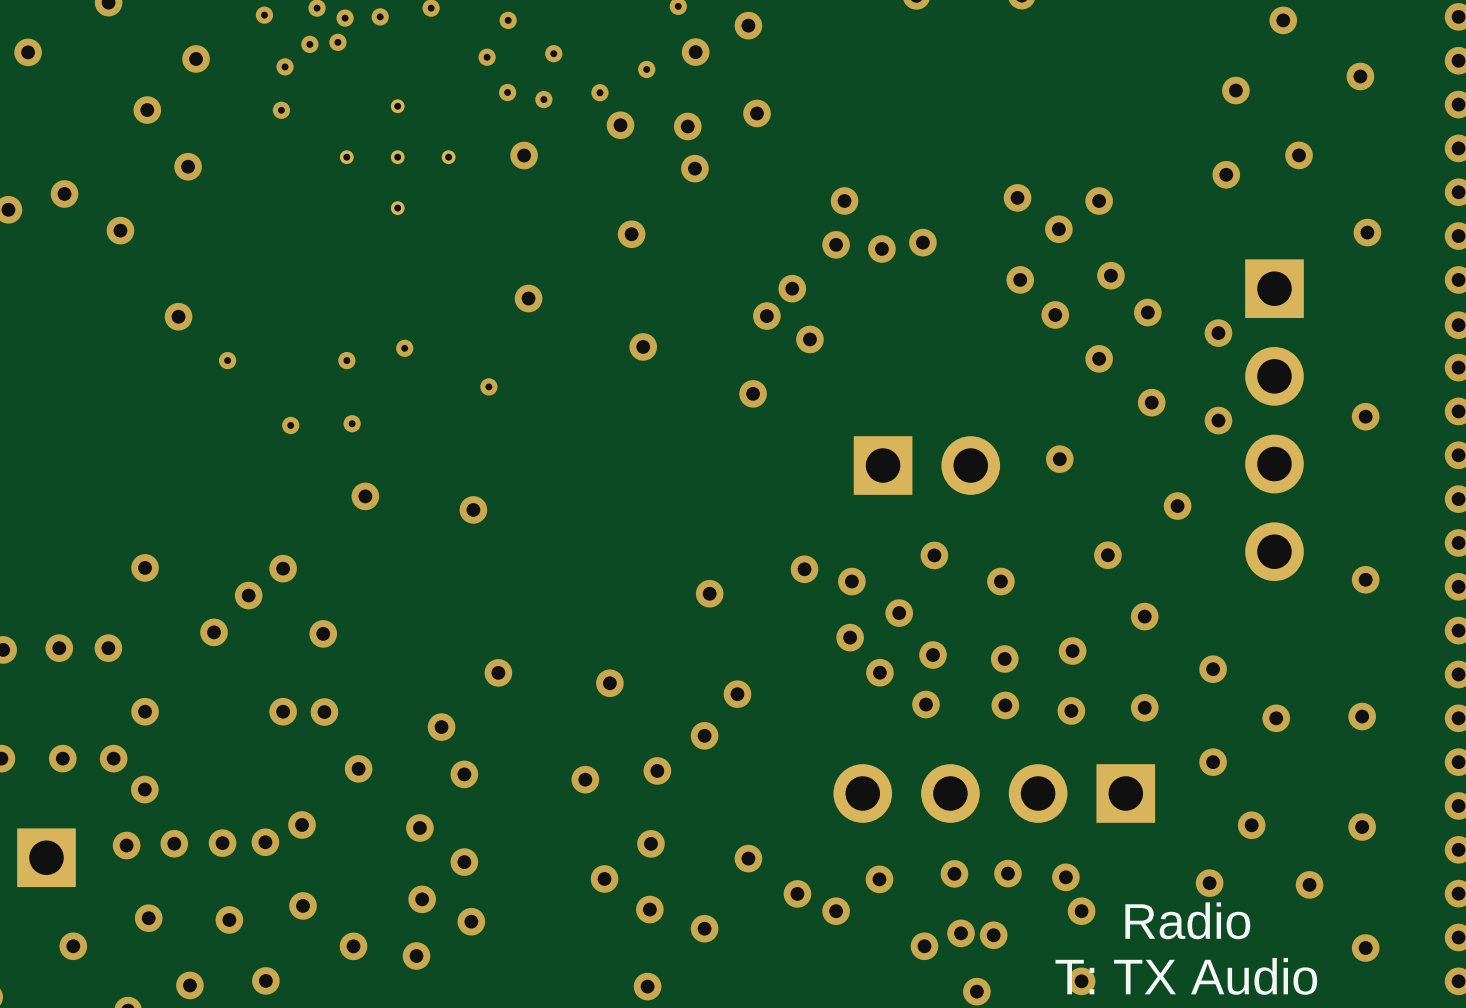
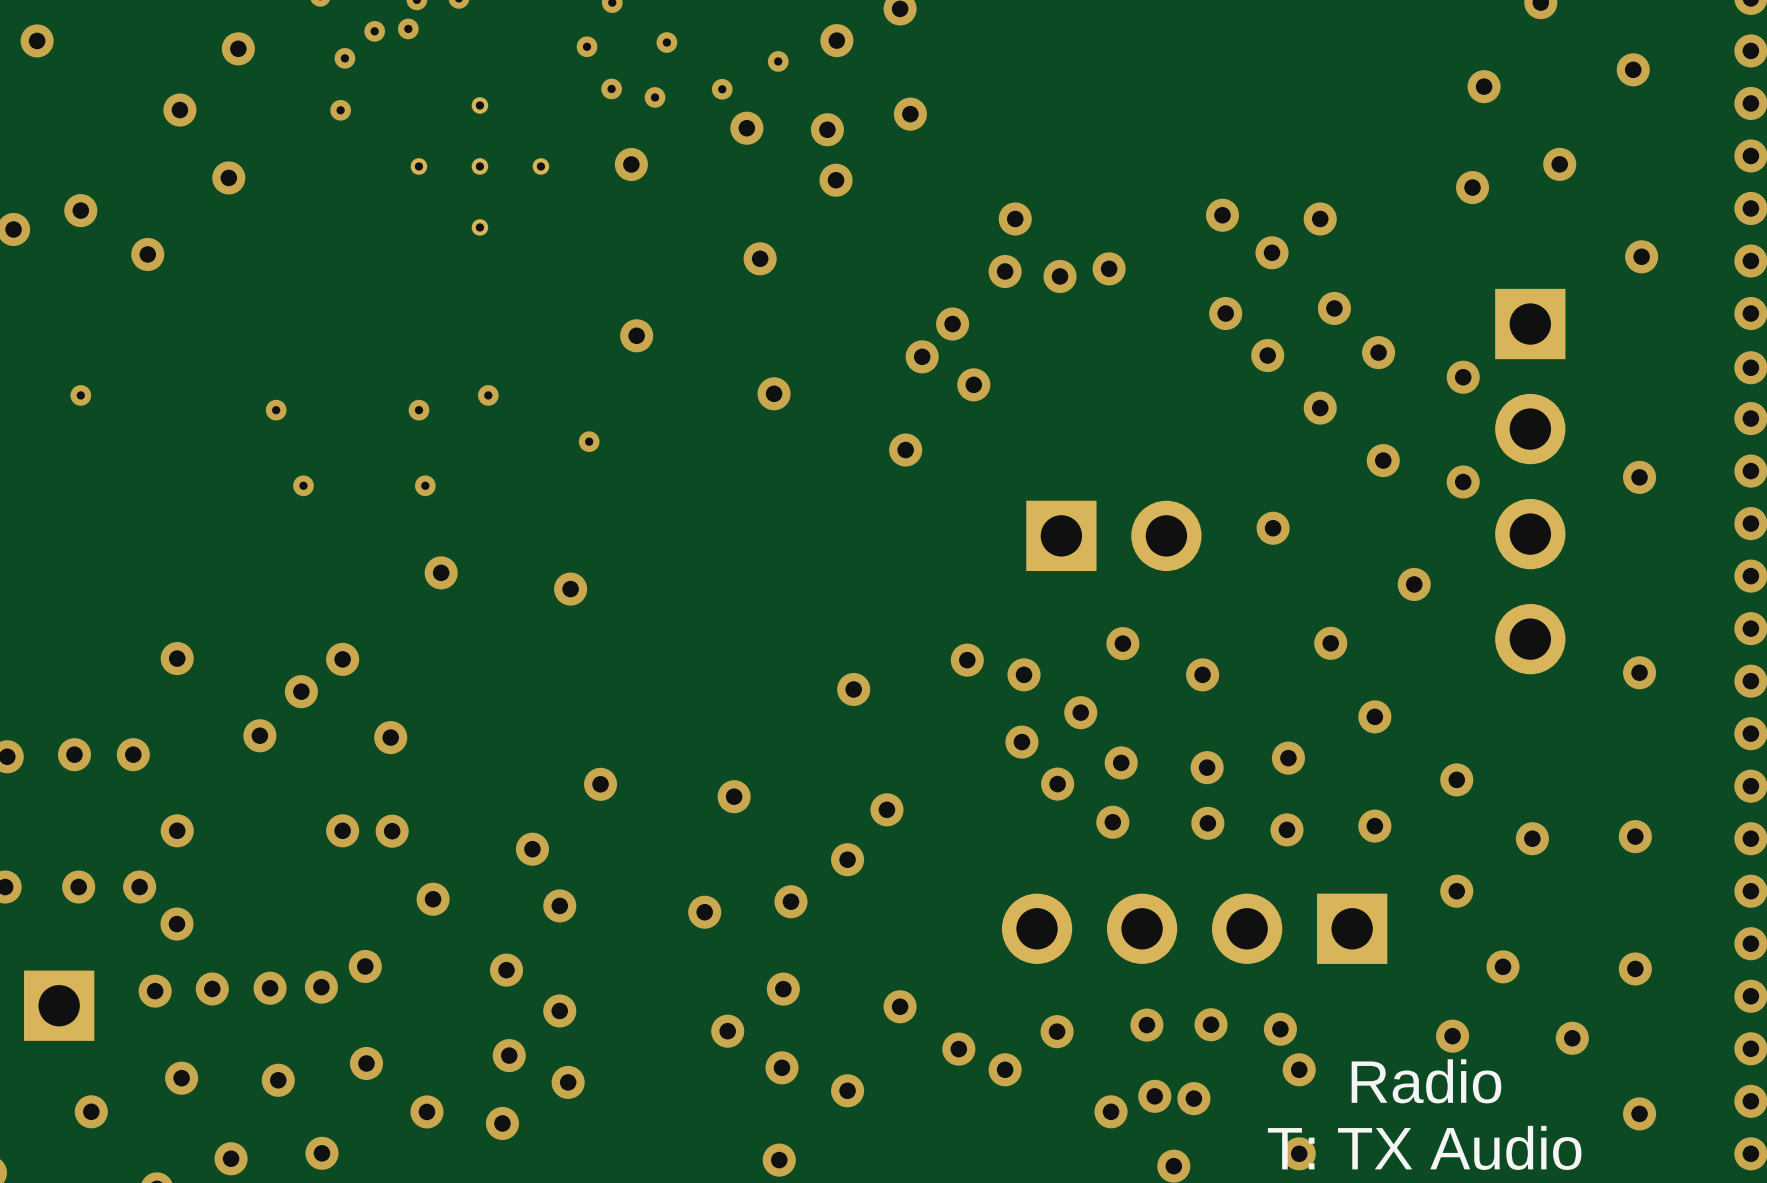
via: (178, 316) -> none
via: none -> (80, 395)
via position: (290, 425) -> (303, 485)

